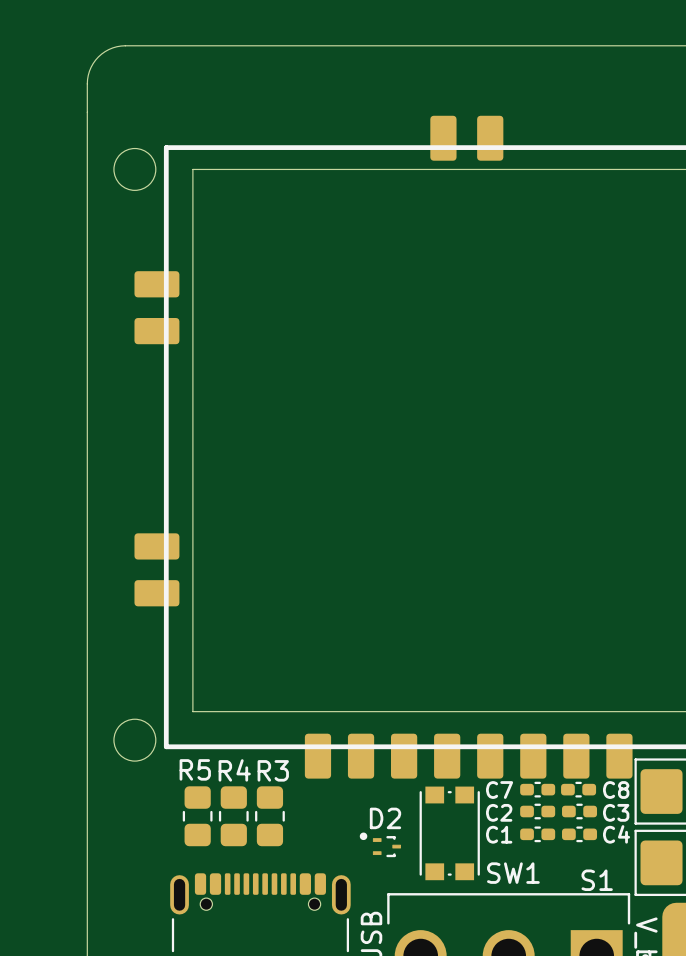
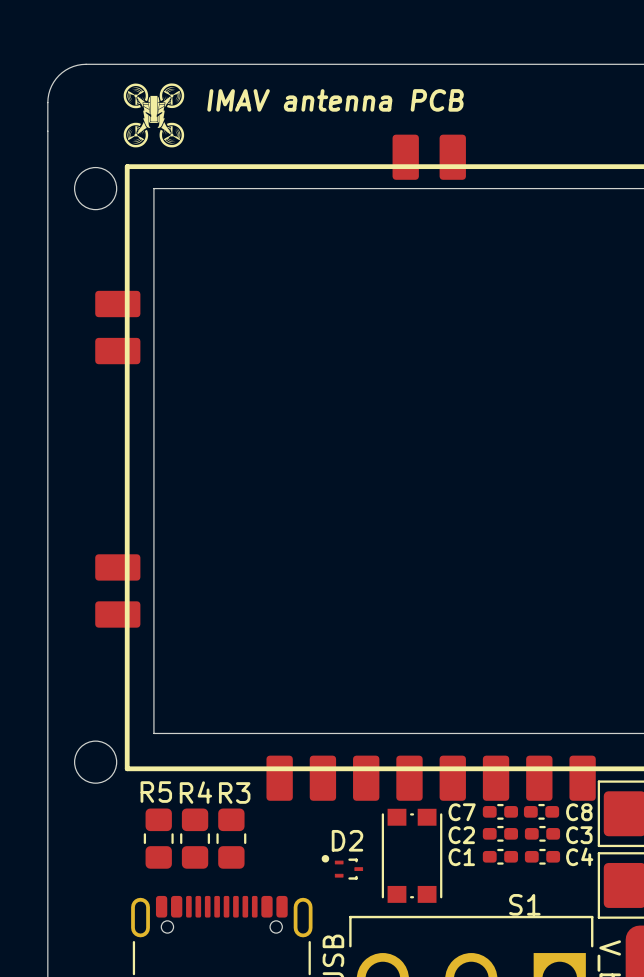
drawing: none -> [123, 83, 185, 148]
text: none -> IMAV antenna PCB (335, 100)
text: SW1 (513, 873) -> none
S1 name position: S1 (597, 880) -> S1 (524, 904)

